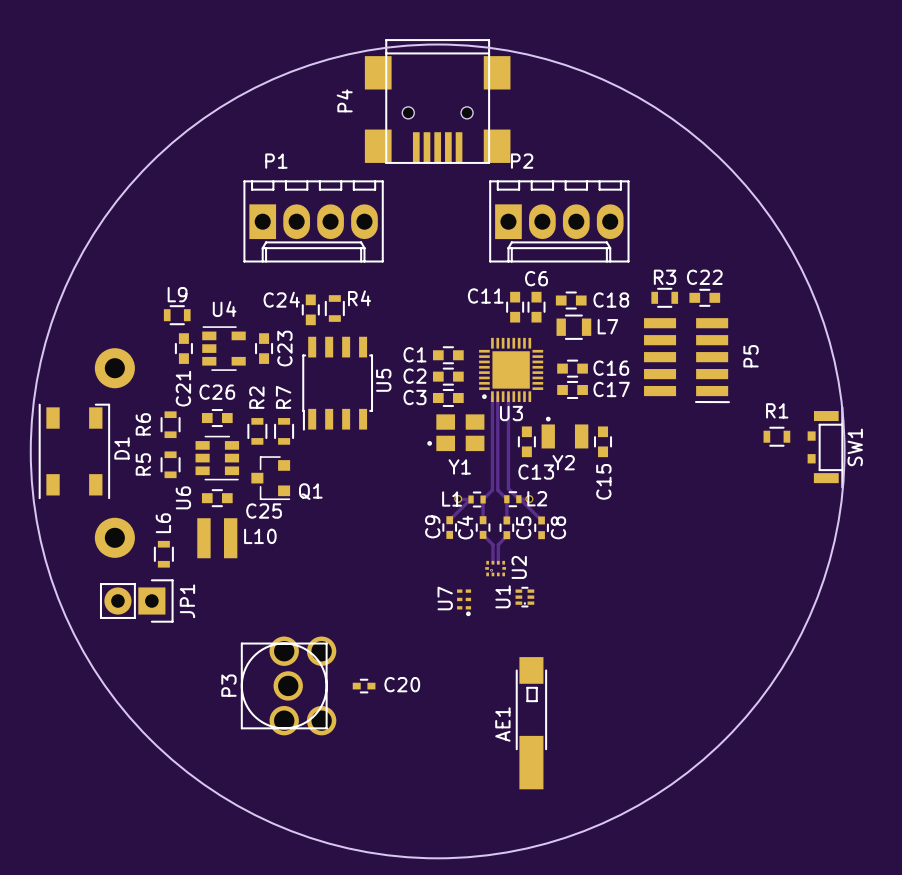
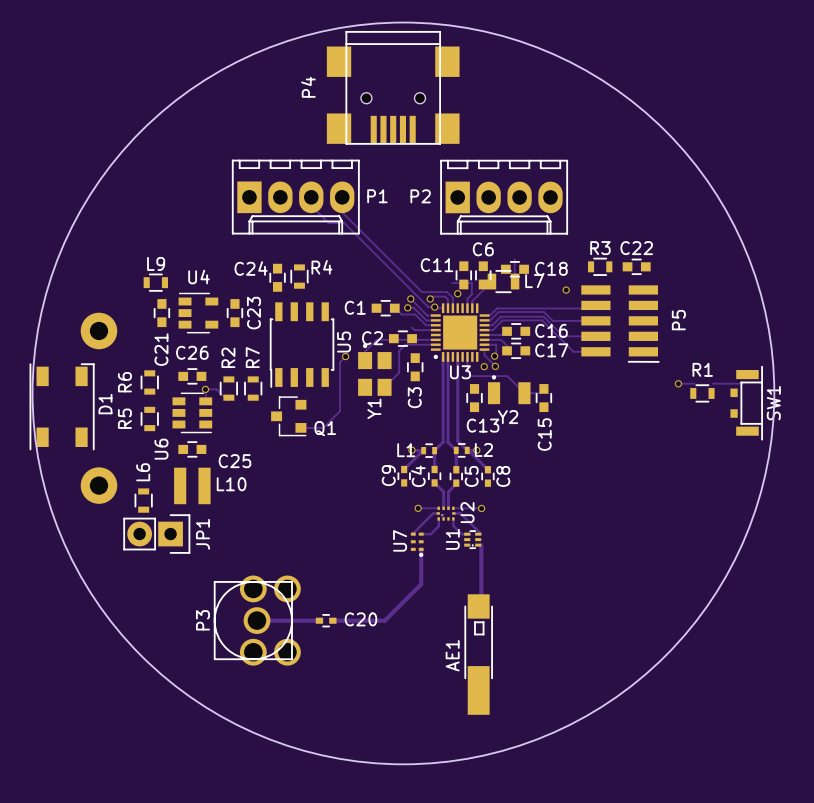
P1 name position: P1 (276, 161) -> P1 (377, 196)
P2 name position: P2 (522, 161) -> P2 (420, 196)
P1 position: (313, 221) -> (295, 197)
track: none -> (311, 197) (311, 205) (328, 223) (344, 223) (428, 307) (443, 308)
track: none -> (342, 197) (342, 212) (422, 292) (447, 292) (452, 297) (452, 308)
track: none -> (514, 259) (515, 281)
track: none -> (491, 281) (472, 301) (472, 308)
track: none -> (452, 283) (471, 283)
track: none -> (471, 283) (471, 294) (467, 298) (467, 308)
via: none -> (566, 290)
via: none -> (457, 293)
L7 position: (573, 327) -> (503, 281)
track: none -> (410, 298) (427, 315) (435, 315)
via: none -> (410, 298)
track: none -> (430, 298) (432, 296) (445, 296) (447, 299) (447, 308)
via: none -> (430, 298)
track: none -> (595, 305) (592, 308) (497, 308) (489, 315) (484, 315)
track: none -> (407, 307) (413, 307) (426, 320) (435, 320)
via: none -> (407, 307)
via: none -> (434, 307)
track: none -> (394, 312) (394, 308) (401, 314) (415, 314) (425, 325) (435, 325)
C1 position: (448, 355) -> (385, 308)
track: none -> (484, 320) (490, 320) (498, 311) (543, 311) (552, 320) (595, 320)
track: none -> (484, 325) (492, 325) (500, 316) (543, 316) (563, 336) (595, 336)
track: none -> (412, 327) (414, 330) (435, 330)
track: none -> (509, 329) (500, 334) (481, 334)
track: none -> (484, 330) (492, 330) (502, 320) (542, 320) (573, 351) (595, 351)
track: none -> (435, 339) (376, 339) (365, 351) (365, 360)
track: none -> (484, 339) (501, 339) (509, 348)
track: none -> (435, 344) (405, 344) (399, 350) (399, 372) (384, 387)
track: none -> (484, 344) (496, 344)
track: none -> (496, 344) (494, 356)
track: none -> (484, 349) (484, 355) (495, 366)
via: none -> (494, 356)
track: none -> (345, 356) (340, 362) (340, 411) (323, 427) (300, 427)
via: none -> (345, 356)
track: none -> (467, 356) (467, 372) (471, 376) (507, 376) (524, 393) (539, 393) (543, 388)
C3 name position: C3 (414, 397) -> C3 (414, 397)
C3 rotation: 0° (448, 397) -> 90° clockwise (415, 367)
via: none -> (484, 366)
via: none -> (495, 366)
track: none -> (742, 383) (712, 383)
via: none -> (678, 383)
track: none -> (694, 383) (678, 383)
via: none -> (205, 389)
Y1 rotation: 0° (455, 432) -> 90° clockwise (374, 369)
Y1 position: (455, 432) -> (374, 369)
track: none -> (228, 400) (216, 389) (205, 389) (205, 401)
round board edge position: (437, 451) -> (403, 393)
Q1 position: (270, 478) -> (288, 416)
track: none -> (418, 508) (438, 508)
via: none -> (418, 508)
track: none -> (453, 508) (481, 508)
via: none -> (481, 508)
track: none -> (438, 513) (433, 513) (413, 534)
track: none -> (453, 513) (460, 513) (481, 534)
track: none -> (438, 518) (438, 526) (430, 534) (421, 534)
track: none -> (453, 518) (453, 525) (461, 534) (470, 534)
JP1 position: (136, 601) -> (156, 534)
track: none -> (481, 545) (480, 607)
track: none -> (421, 549) (421, 584) (384, 620) (332, 620)
track: none -> (257, 620) (319, 620)

